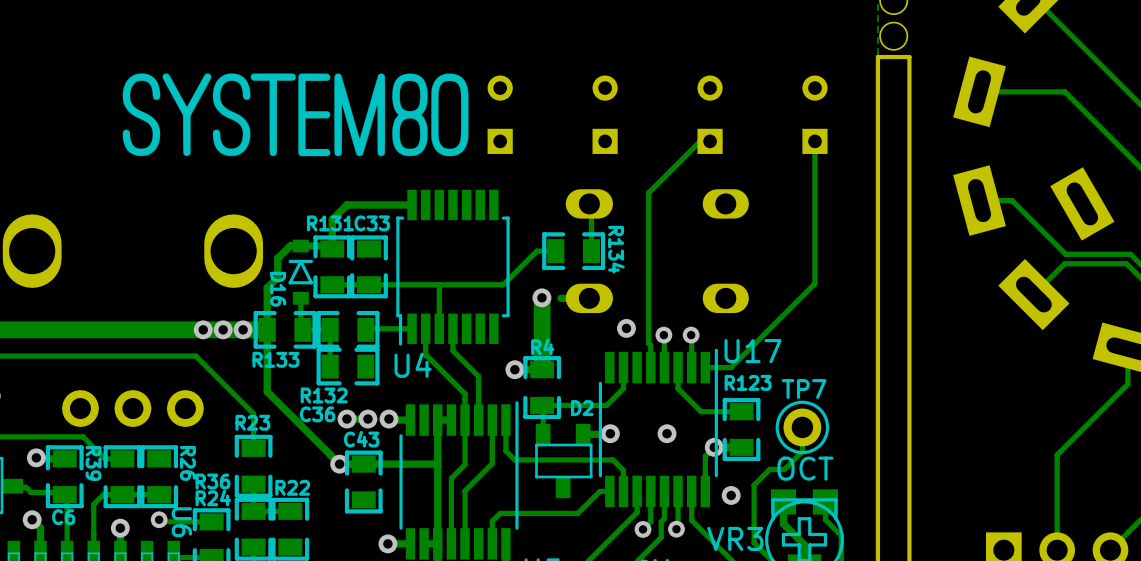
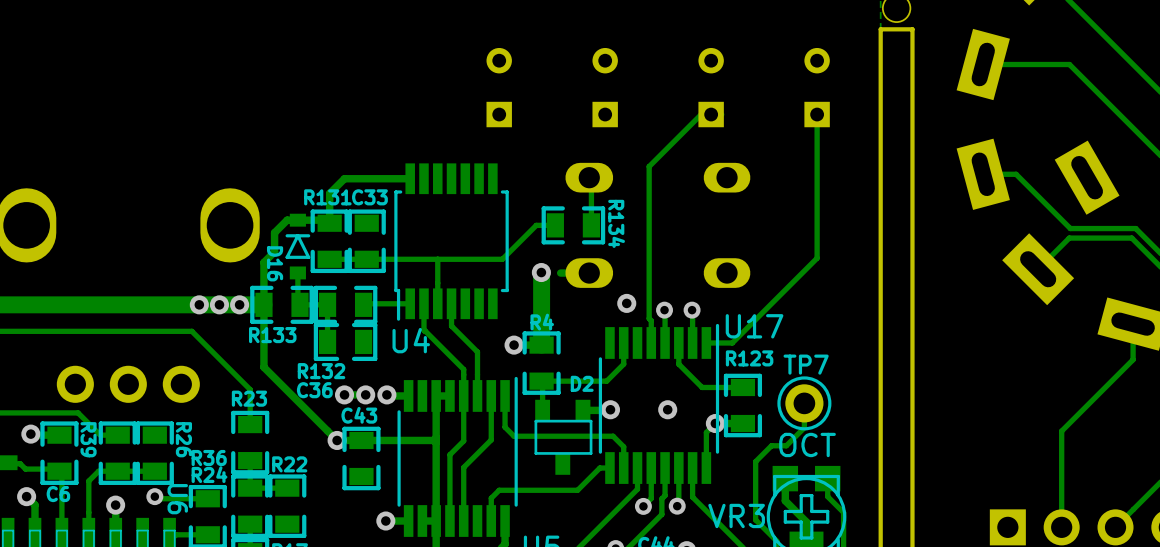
drawing: [122, 73, 469, 157] -> none
via: (731, 495) -> none

